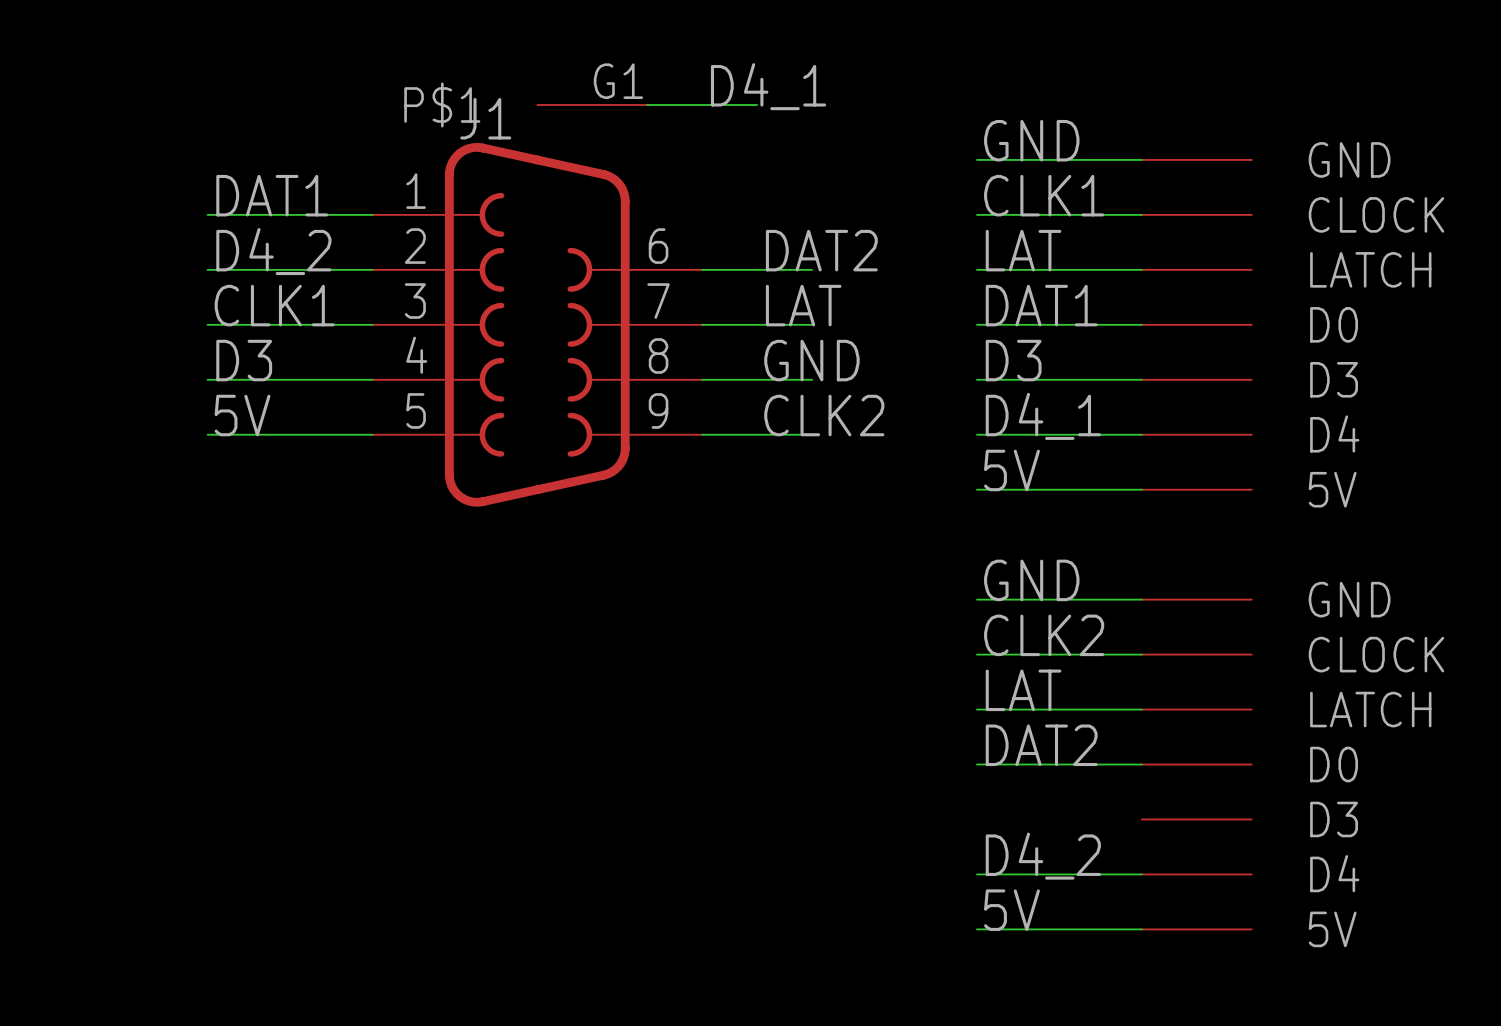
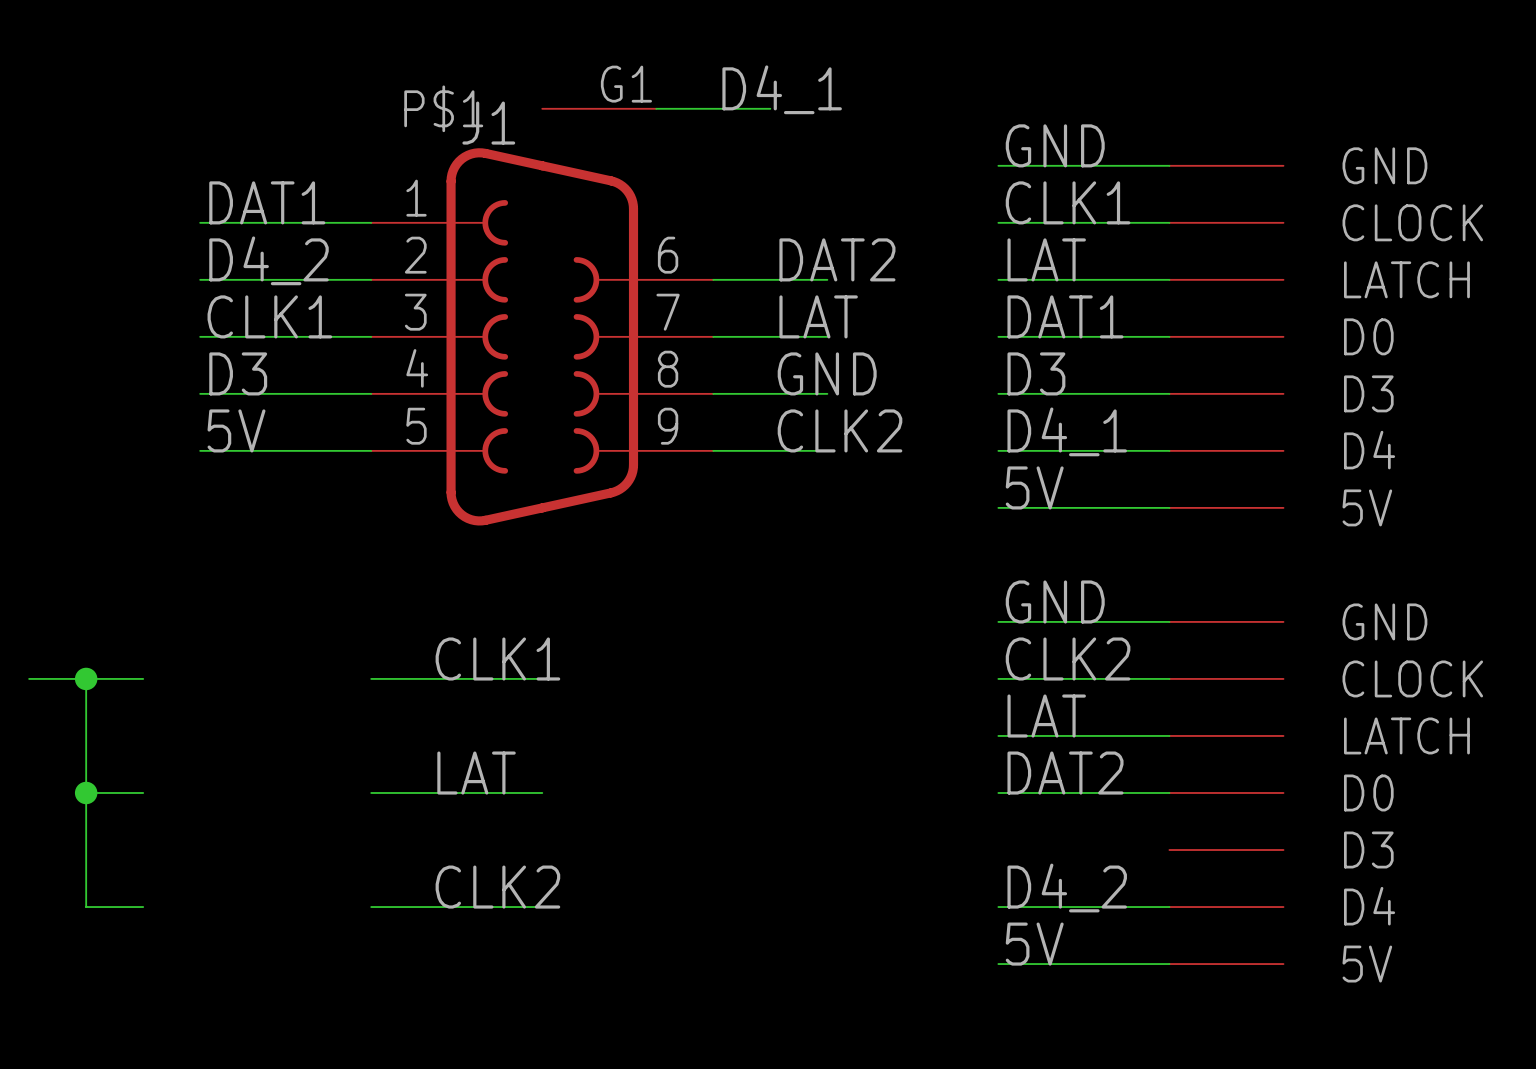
label: none -> CLK1 (497, 659)
wire: none -> (29, 678) (143, 678)
wire: none -> (86, 678) (86, 907) (143, 907)
junction: none -> (86, 678)
wire: none -> (371, 678) (542, 678)
label: none -> LAT (476, 773)
wire: none -> (86, 792) (143, 792)
junction: none -> (86, 792)
wire: none -> (371, 792) (542, 792)
label: none -> CLK2 (497, 887)
wire: none -> (371, 907) (542, 907)

